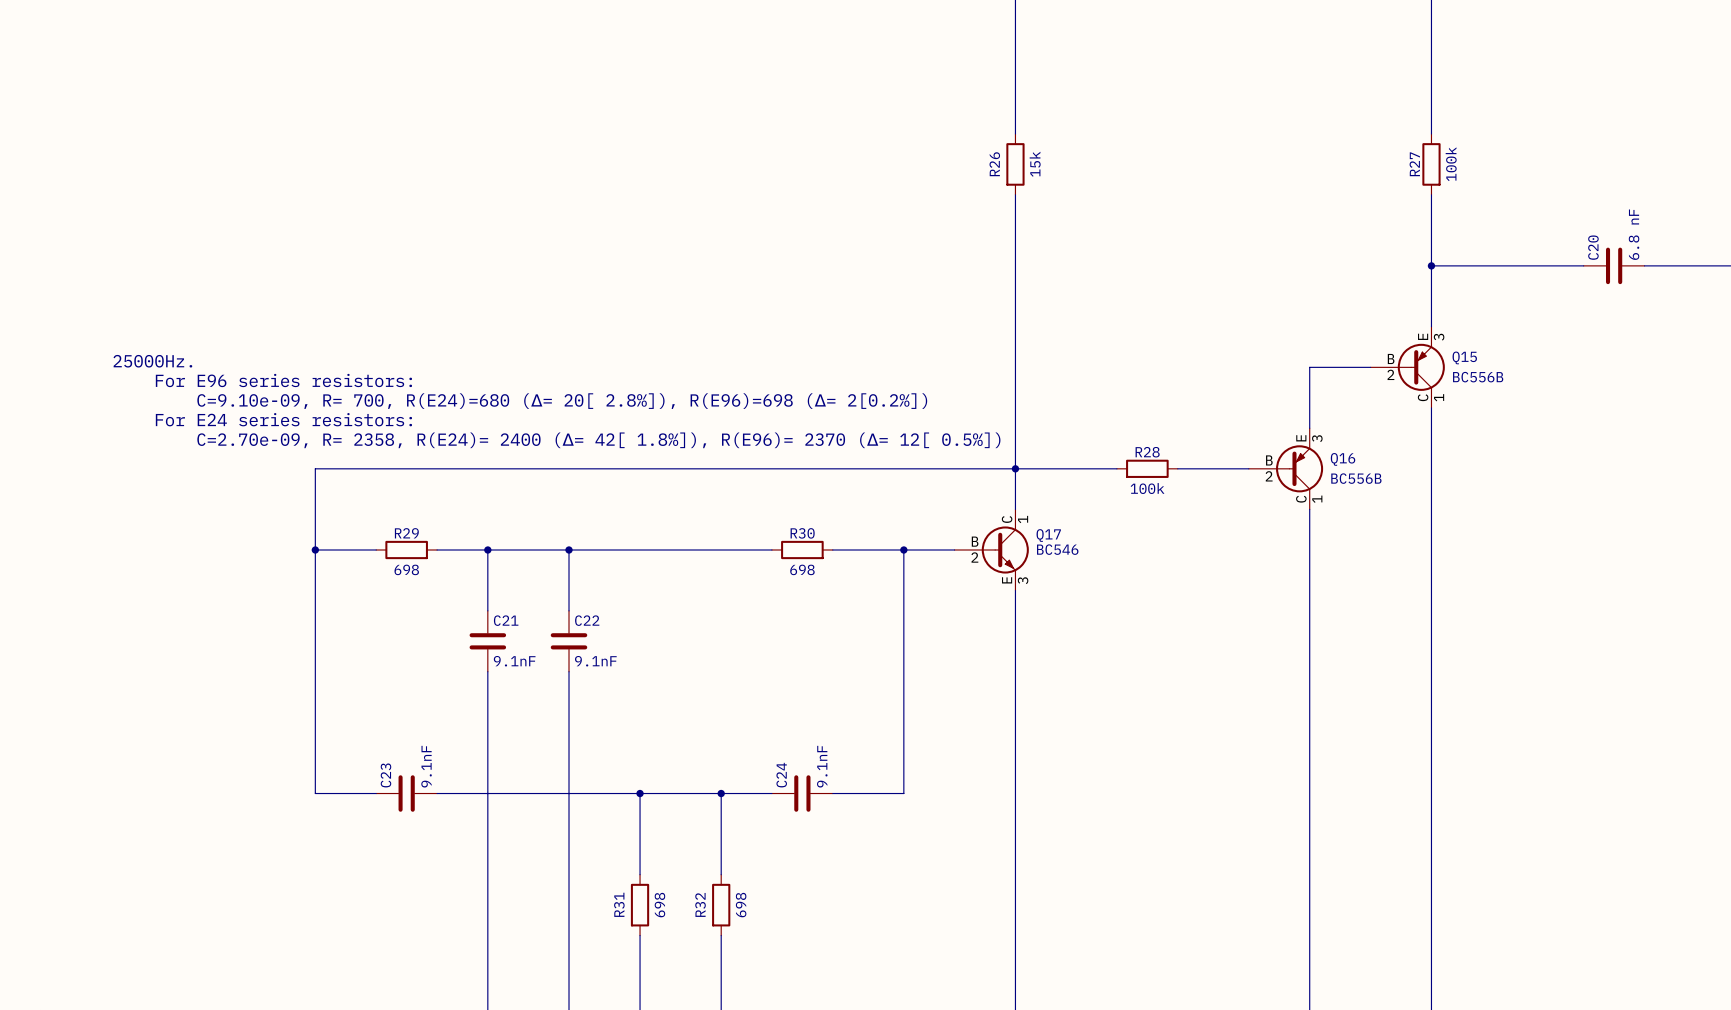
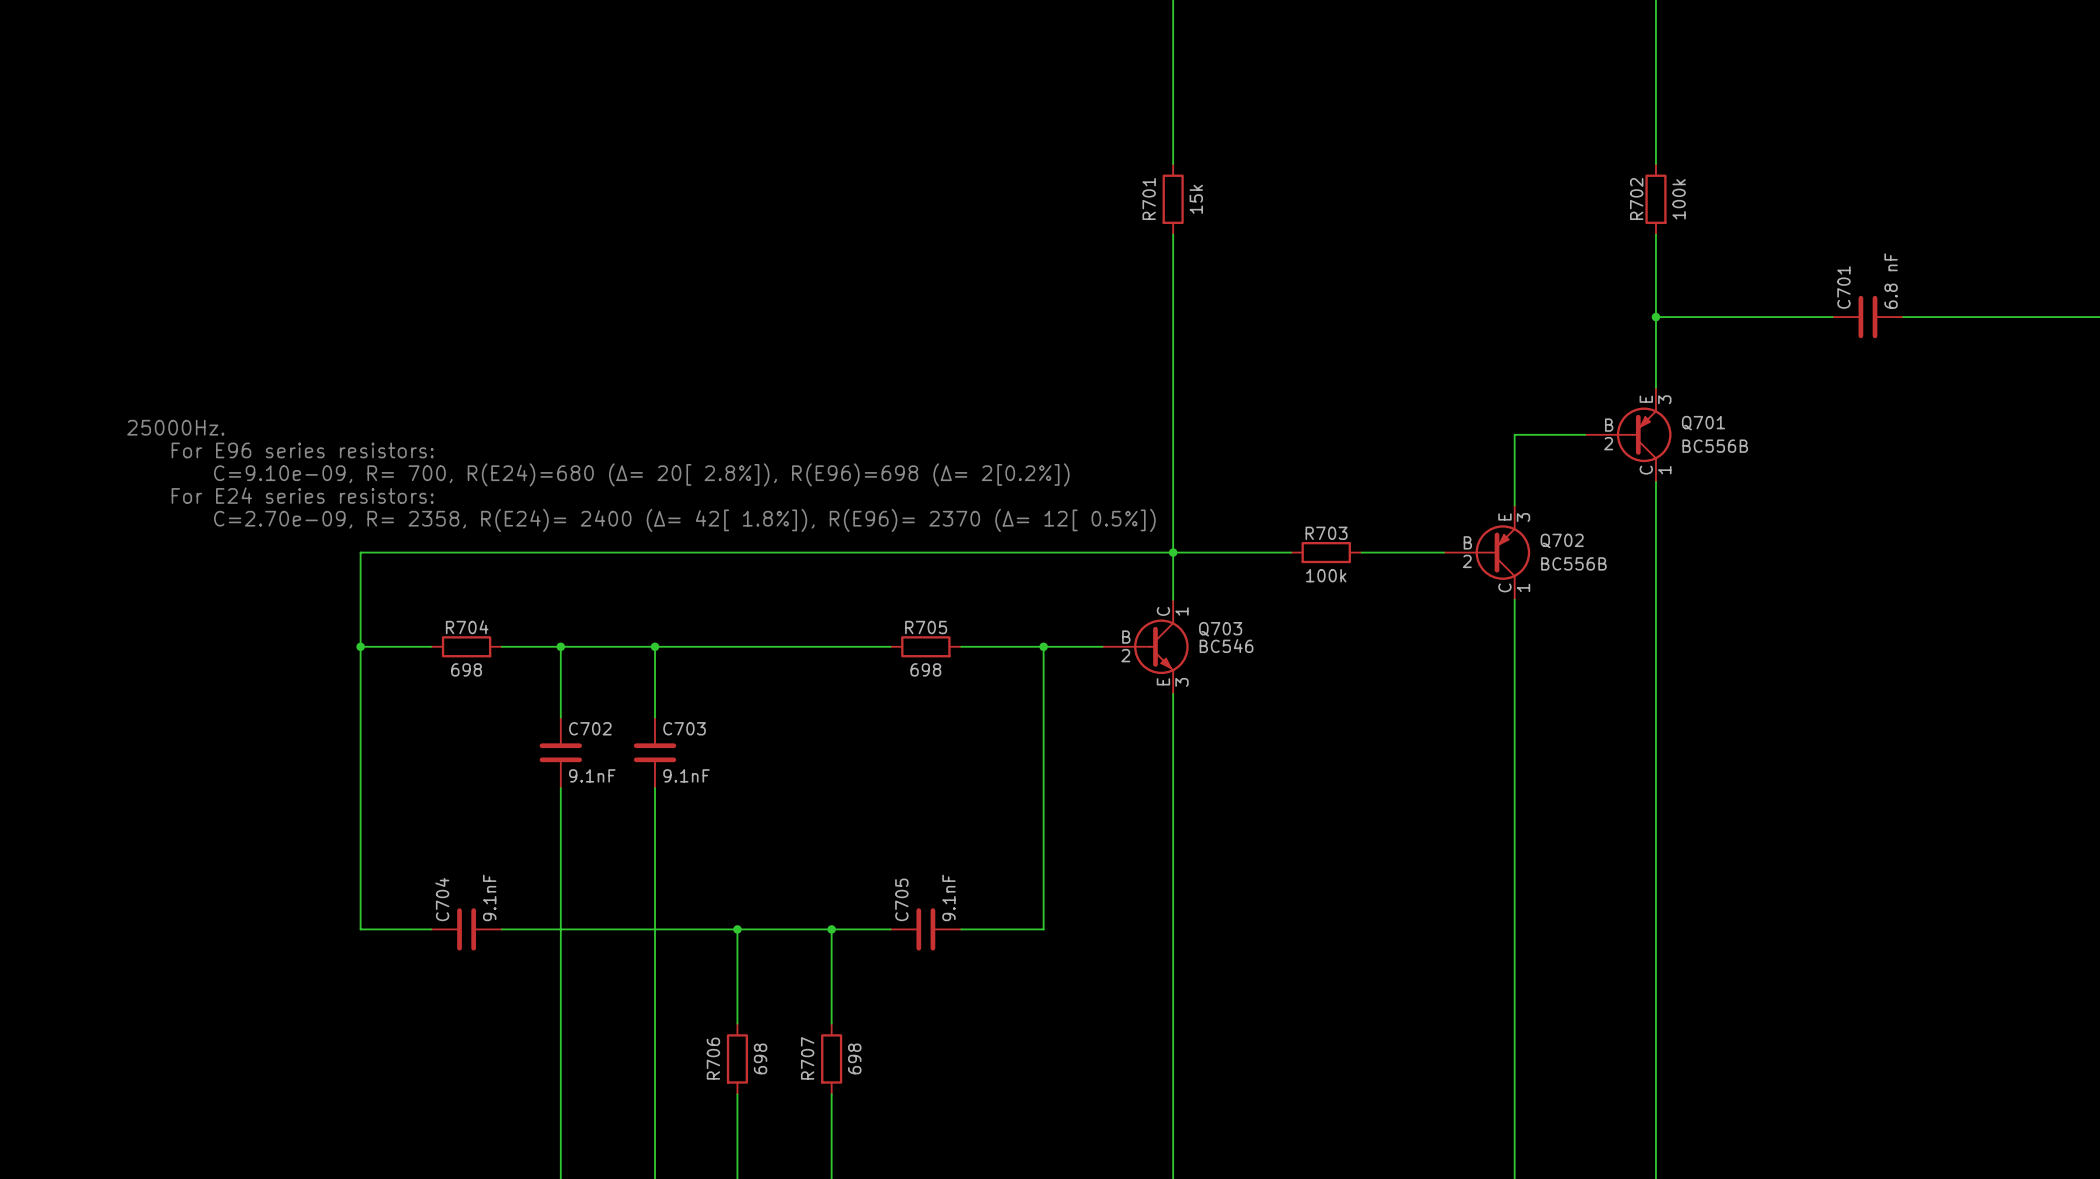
R26 name: R26 (994, 164) -> R701 (1149, 199)
R27 name: R27 (1414, 164) -> R702 (1636, 199)
C20 name: C20 (1593, 247) -> C701 (1843, 287)
Q15 name: Q15 (1464, 357) -> Q701 (1703, 423)
R28 name: R28 (1147, 452) -> R703 (1326, 533)
Q16 name: Q16 (1343, 459) -> Q702 (1562, 540)
R29 name: R29 (406, 533) -> R704 (467, 627)
R30 name: R30 (802, 533) -> R705 (926, 627)
Q17 name: Q17 (1048, 535) -> Q703 (1220, 629)
C21 name: C21 (506, 620) -> C702 (590, 728)
C22 name: C22 (587, 620) -> C703 (684, 728)
C23 name: C23 (385, 775) -> C704 (442, 899)
C24 name: C24 (781, 775) -> C705 (901, 899)
R31 name: R31 (619, 904) -> R706 (713, 1058)
R32 name: R32 (700, 904) -> R707 (807, 1058)

